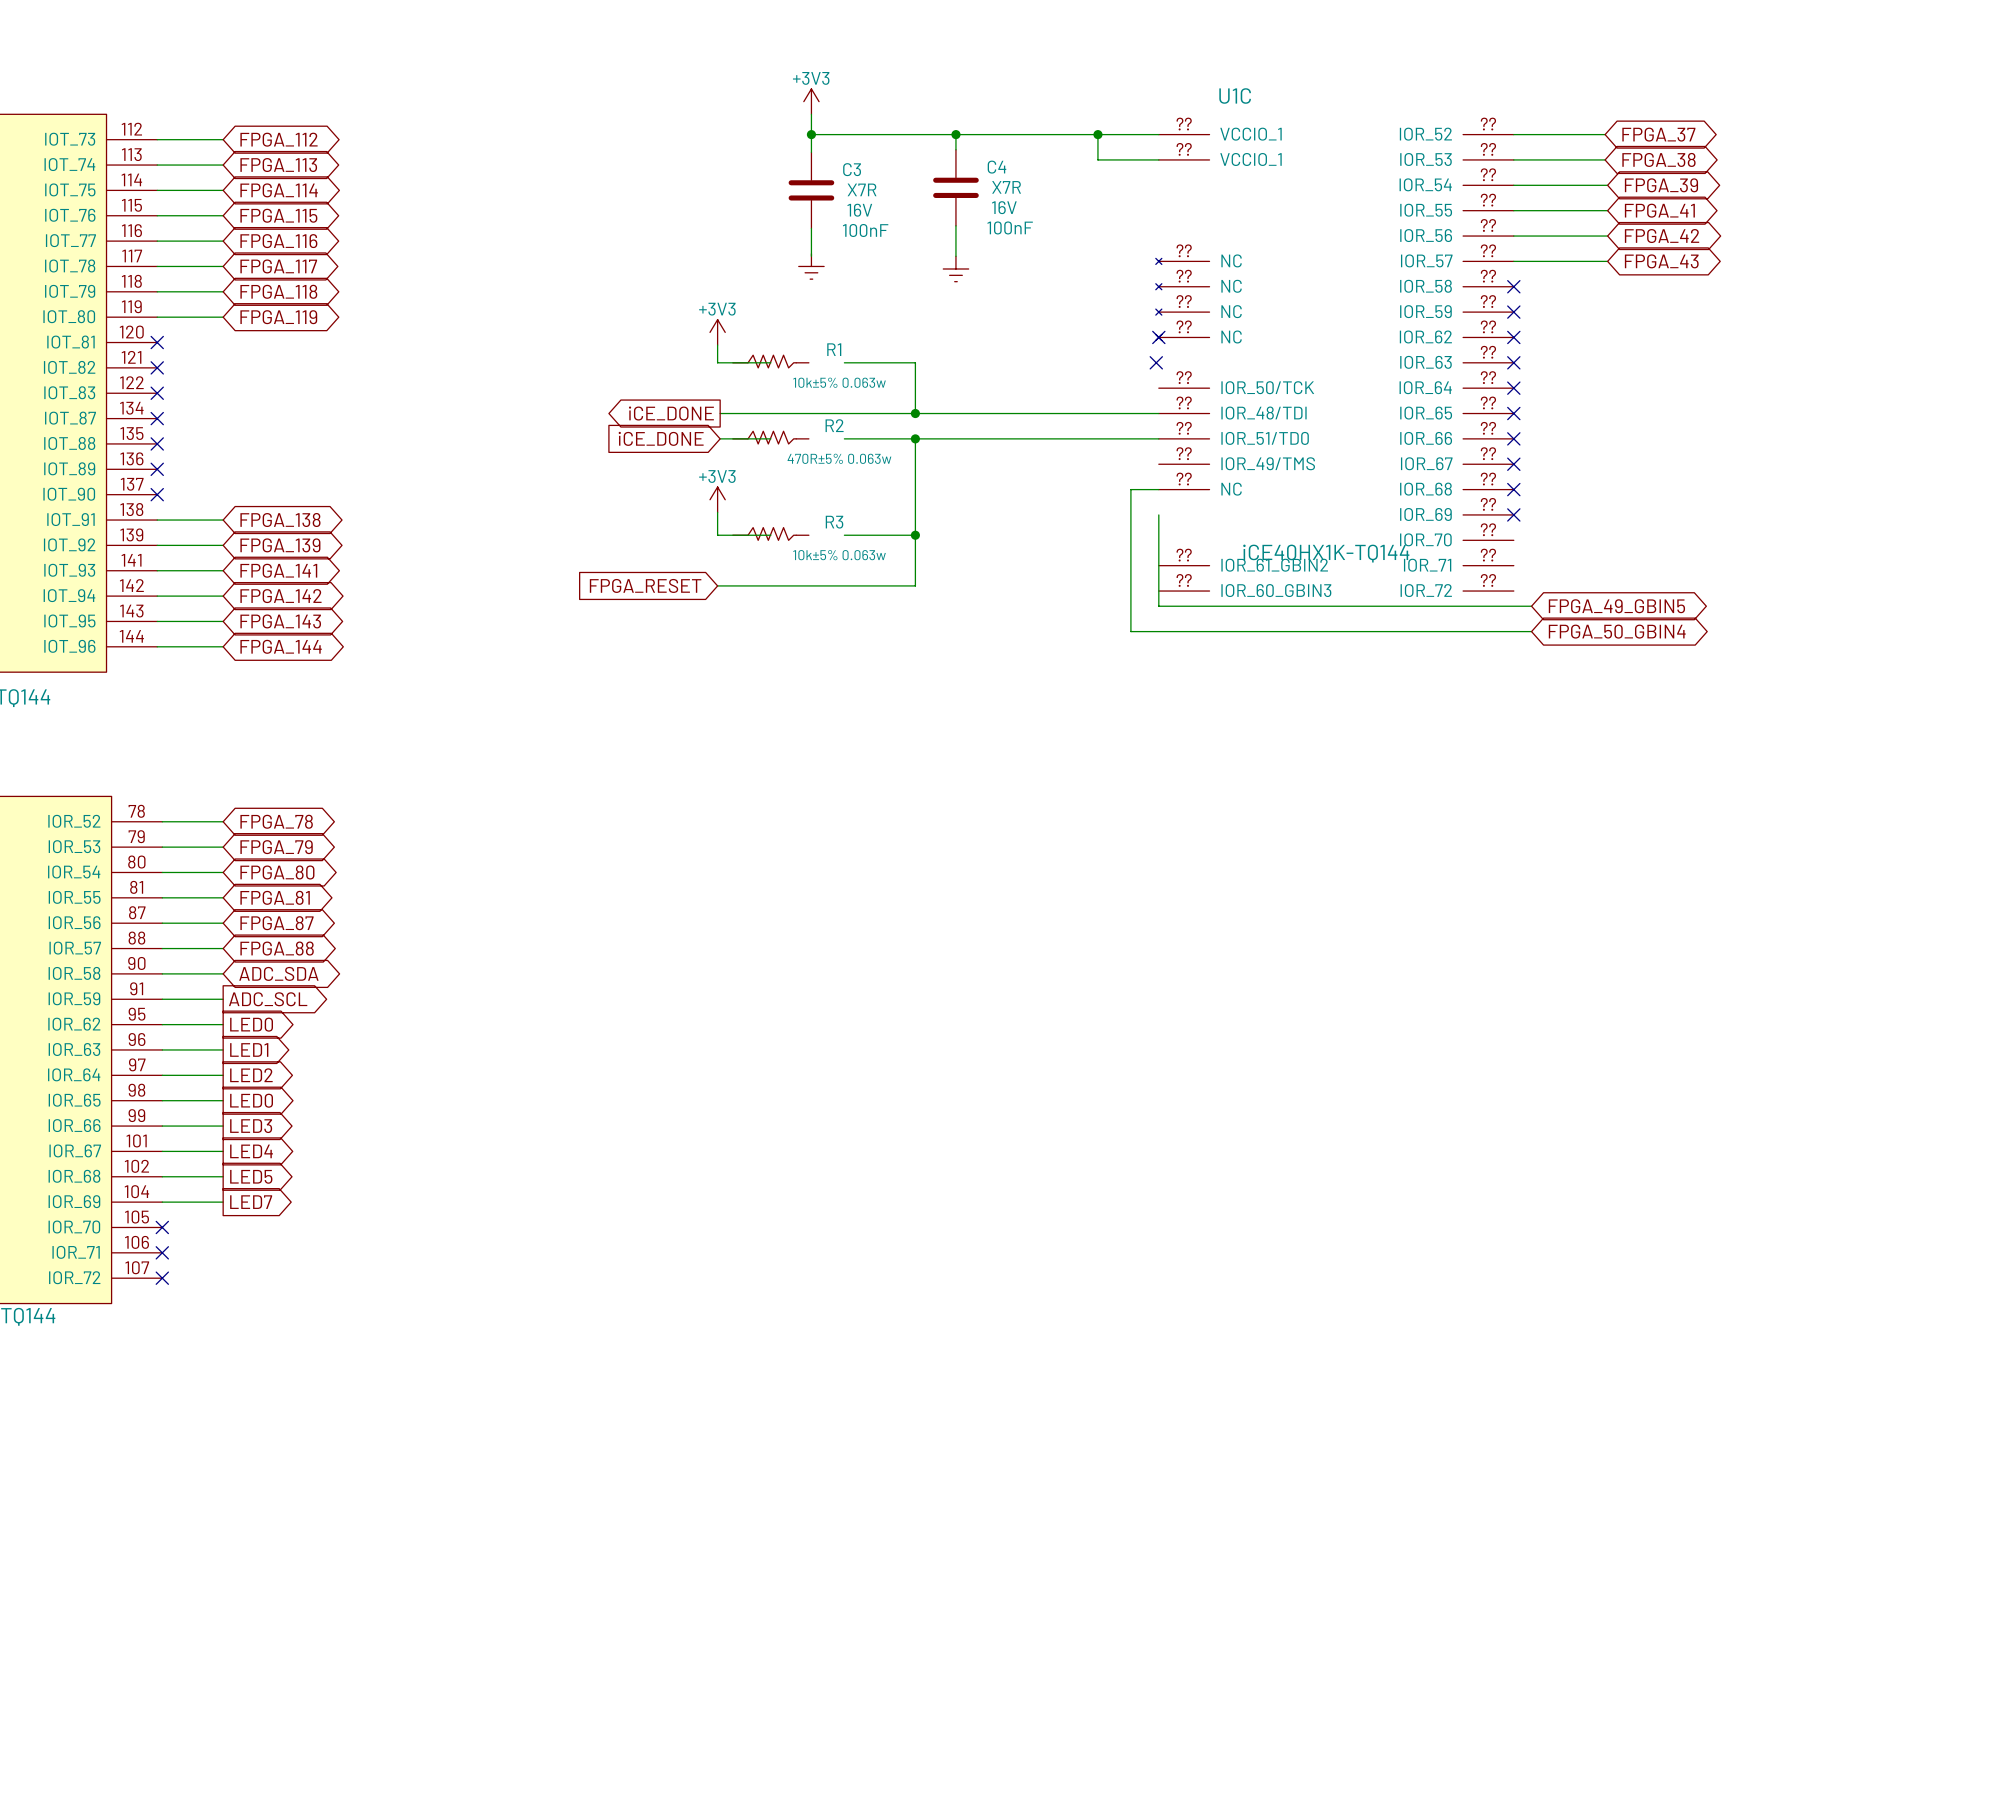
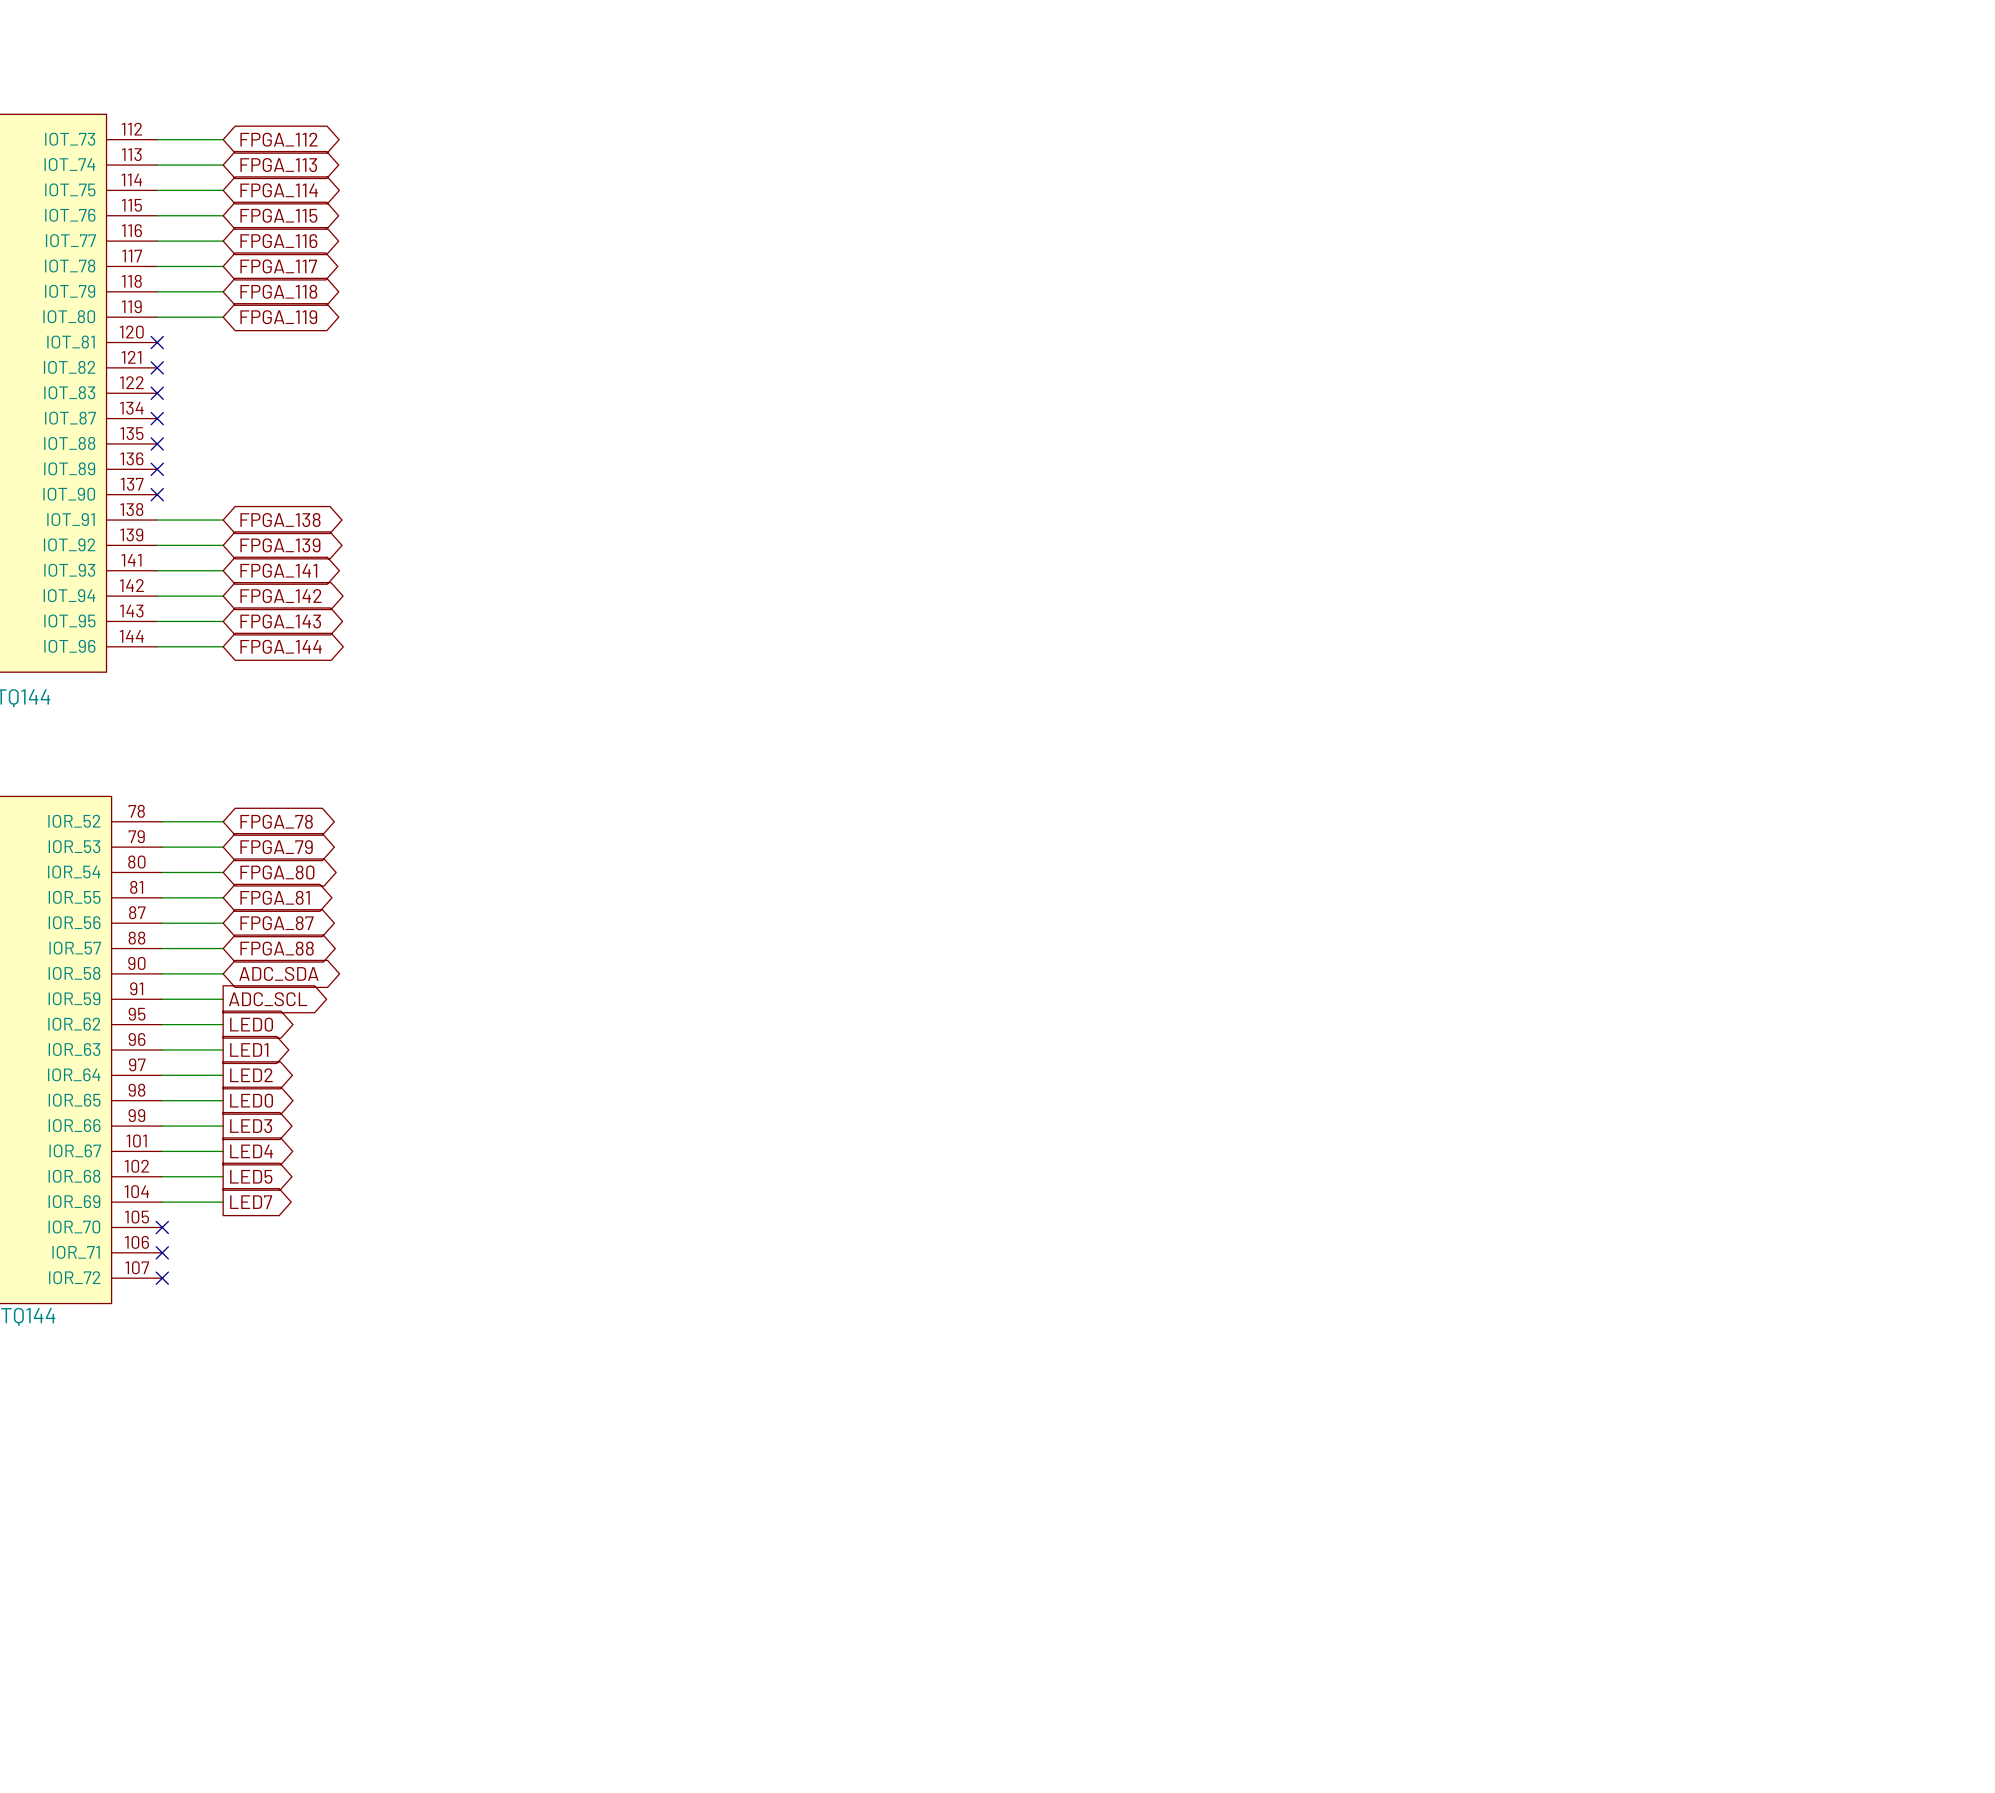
power symbol: +3V3 (811, 101) -> none
wire: (811, 114) (811, 152) -> none
wire: (811, 134) (1158, 134) -> none
junction: (811, 134) -> none
wire: (955, 134) (955, 149) -> none
junction: (955, 134) -> none
wire: (1097, 134) (1097, 159) (1158, 159) -> none
junction: (1097, 134) -> none
wire: (1513, 134) (1605, 134) -> none
global label: FPGA_37 (1658, 134) -> none
wire: (1513, 159) (1605, 159) -> none
global label: FPGA_38 (1658, 159) -> none
wire: (1513, 185) (1607, 185) -> none
global label: FPGA_39 (1661, 185) -> none
C4: 100nF (955, 187) -> none
C3: 100nF (811, 190) -> none
wire: (1513, 210) (1607, 210) -> none
global label: FPGA_41 (1659, 210) -> none
wire: (955, 225) (955, 256) -> none
wire: (811, 228) (811, 256) -> none
wire: (1513, 236) (1607, 236) -> none
global label: FPGA_42 (1662, 236) -> none
wire: (1513, 261) (1607, 261) -> none
global label: FPGA_43 (1661, 261) -> none
power symbol: (811, 266) -> none
power symbol: (955, 268) -> none
no-connect mark: (1513, 286) -> none
no-connect mark: (1513, 312) -> none
power symbol: +3V3 (717, 332) -> none
no-connect mark: (1158, 337) -> none
no-connect mark: (1513, 337) -> none
wire: (717, 345) (717, 362) (770, 362) -> none
R1: 10k±5% 0.063w (770, 361) -> none
wire: (844, 362) (915, 362) (915, 413) -> none
no-connect mark: (1156, 362) -> none
U1C: iCE40HX1K-TQ144 (1334, 362) -> none
no-connect mark: (1513, 362) -> none
no-connect mark: (1513, 388) -> none
global label: iCE_DONE (671, 413) -> none
wire: (720, 413) (1158, 413) -> none
junction: (915, 413) -> none
no-connect mark: (1513, 413) -> none
R2: 470R±5% 0.063w (770, 437) -> none
global label: iCE_DONE (661, 438) -> none
wire: (720, 438) (770, 438) -> none
wire: (844, 438) (1158, 438) -> none
wire: (915, 438) (915, 585) (717, 585) -> none
junction: (915, 438) -> none
no-connect mark: (1513, 438) -> none
no-connect mark: (1513, 464) -> none
wire: (1158, 489) (1130, 489) (1130, 631) (1531, 631) -> none
no-connect mark: (1513, 489) -> none
power symbol: +3V3 (717, 499) -> none
wire: (717, 512) (717, 535) (770, 535) -> none
wire: (1158, 514) (1158, 606) (1531, 606) -> none
no-connect mark: (1513, 514) -> none
R3: 10k±5% 0.063w (770, 533) -> none
wire: (844, 535) (915, 535) -> none
junction: (915, 535) -> none
global label: FPGA_RESET (645, 585) -> none
global label: FPGA_49_GBIN5 (1616, 606) -> none
global label: FPGA_50_GBIN4 (1617, 631) -> none

